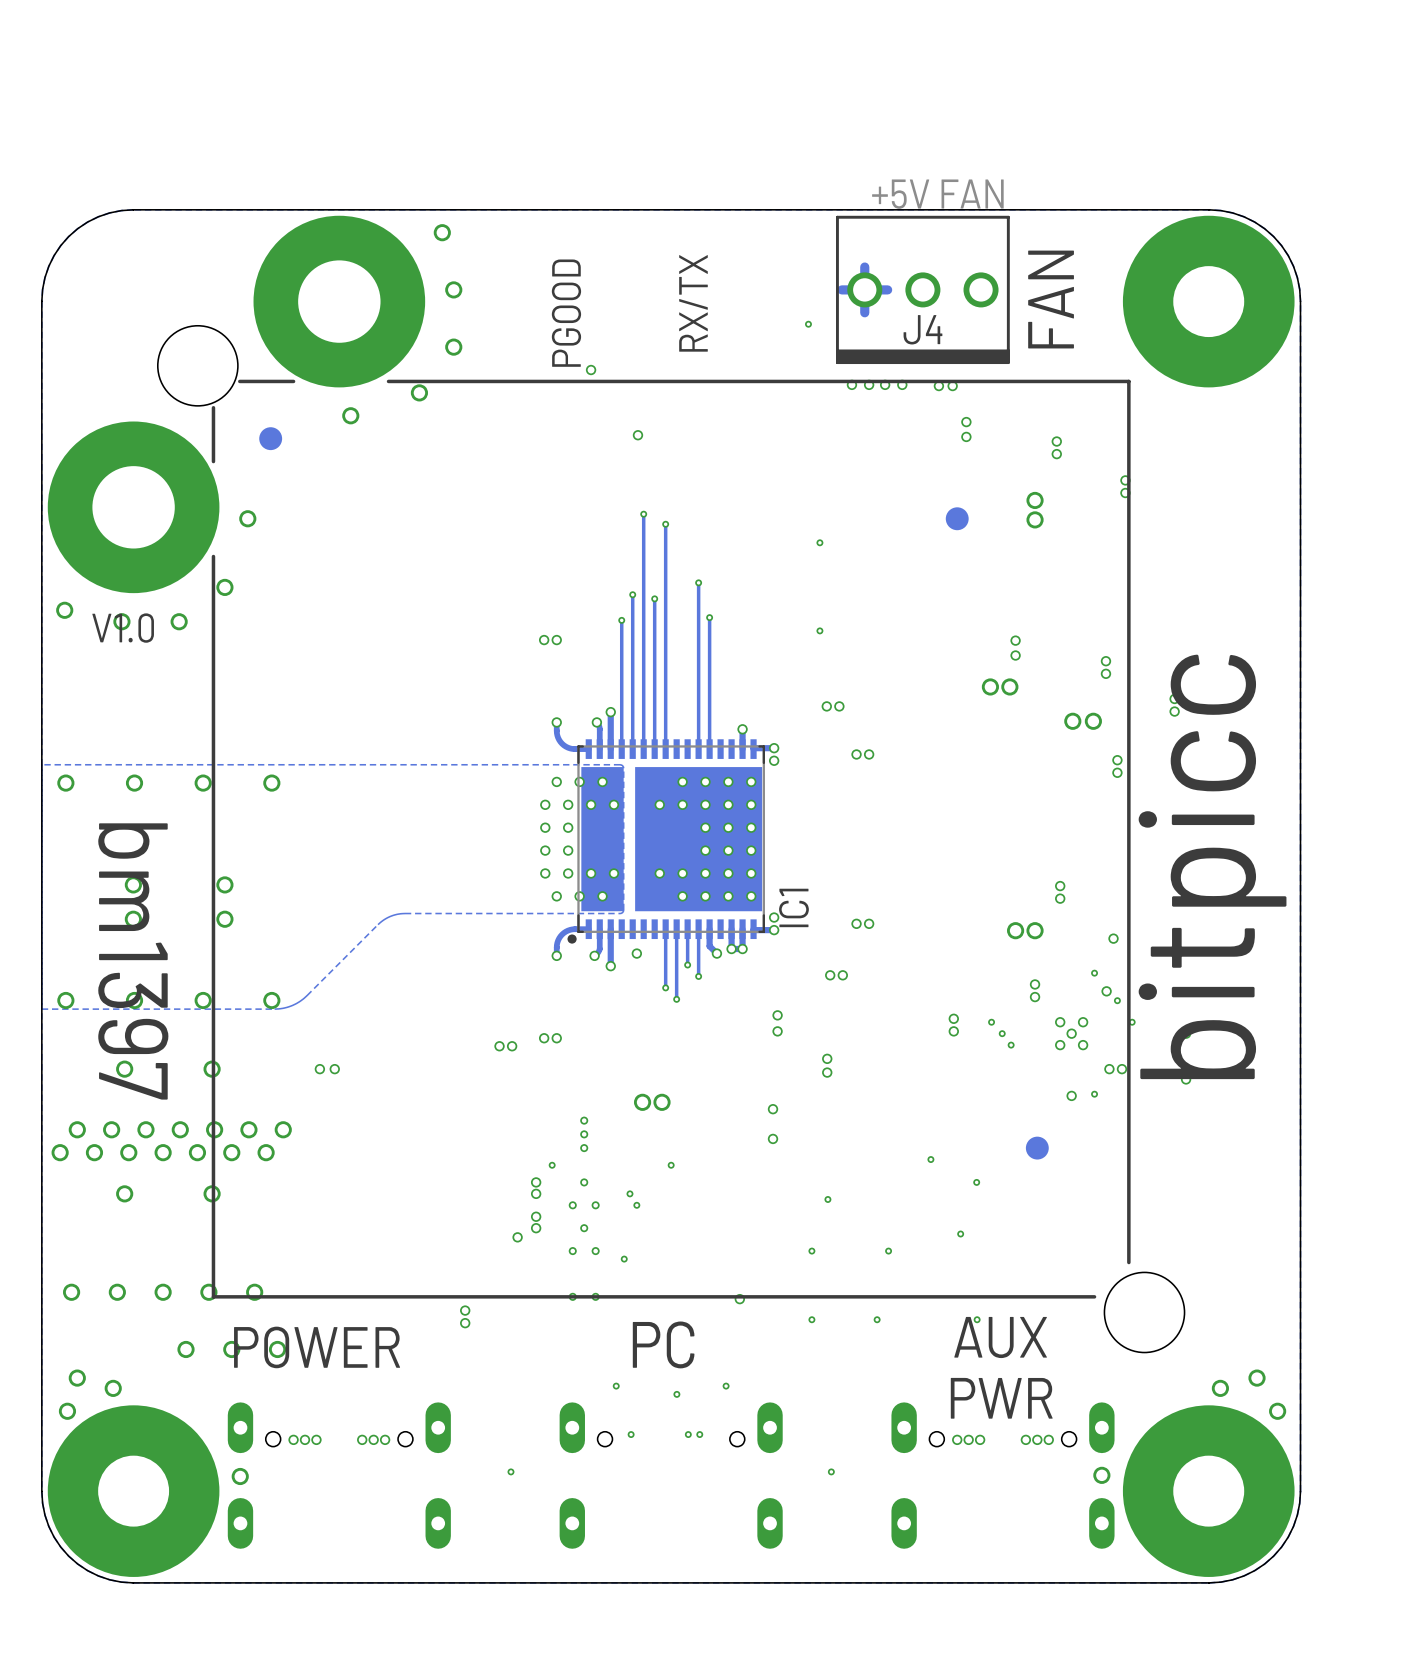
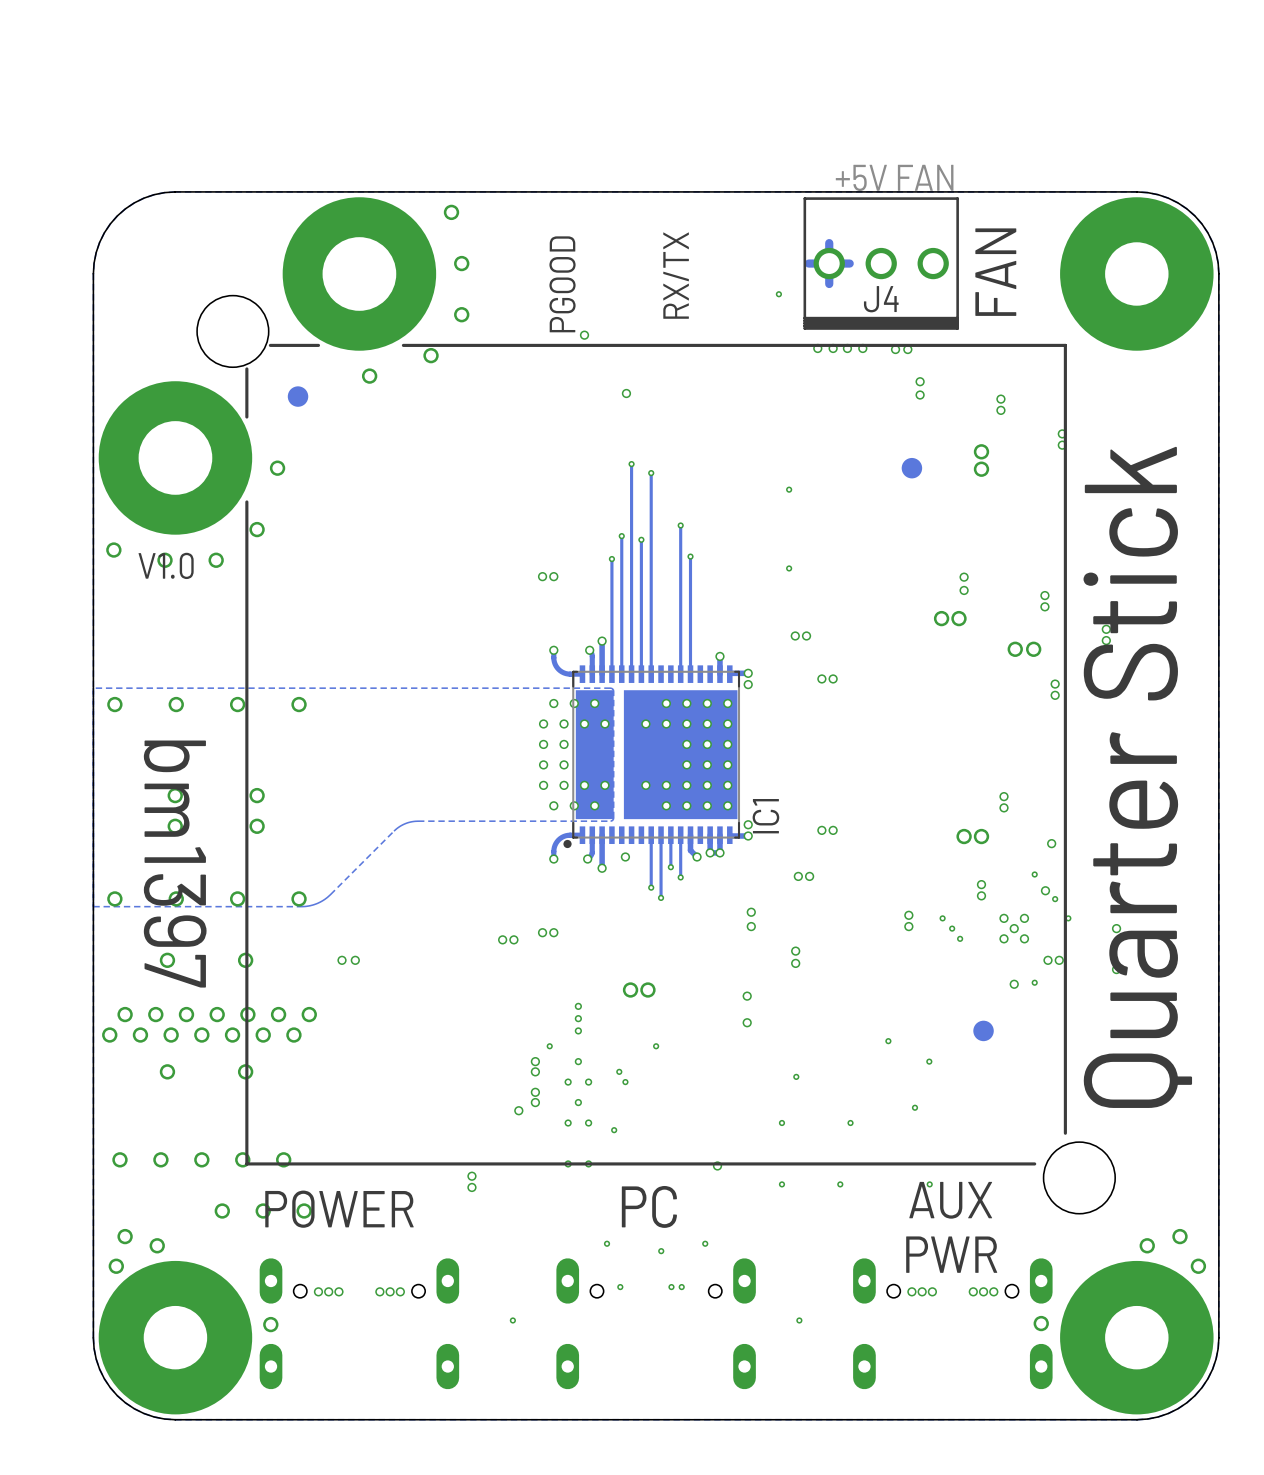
text: none -> Quarter Stick (1137, 777)
text: bitpicc (1212, 866) -> none

